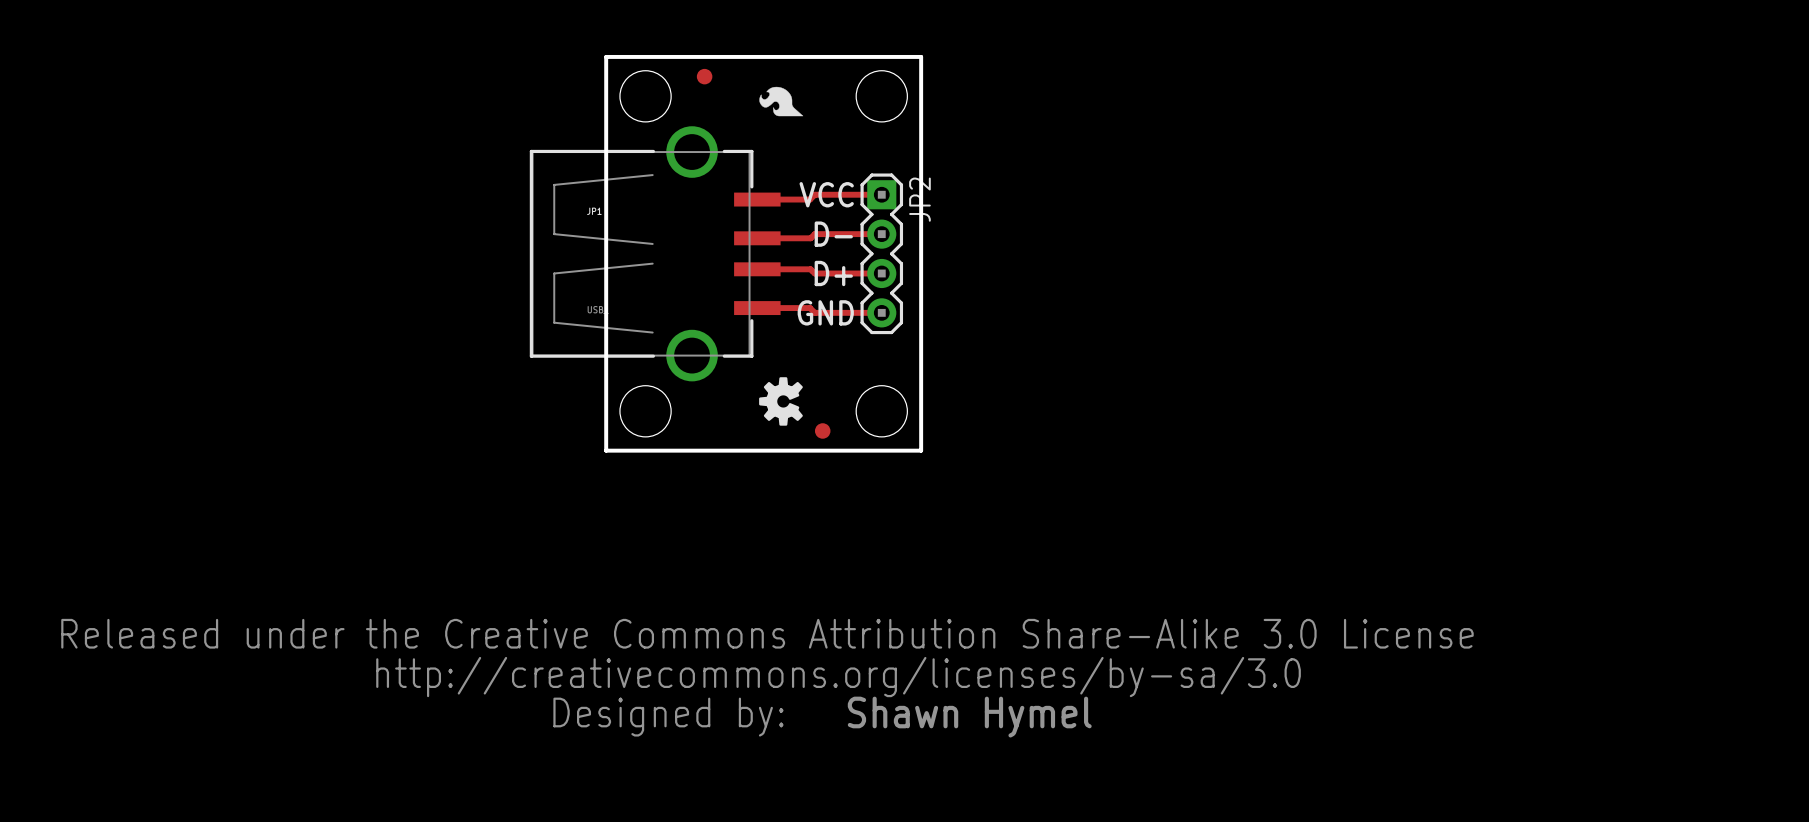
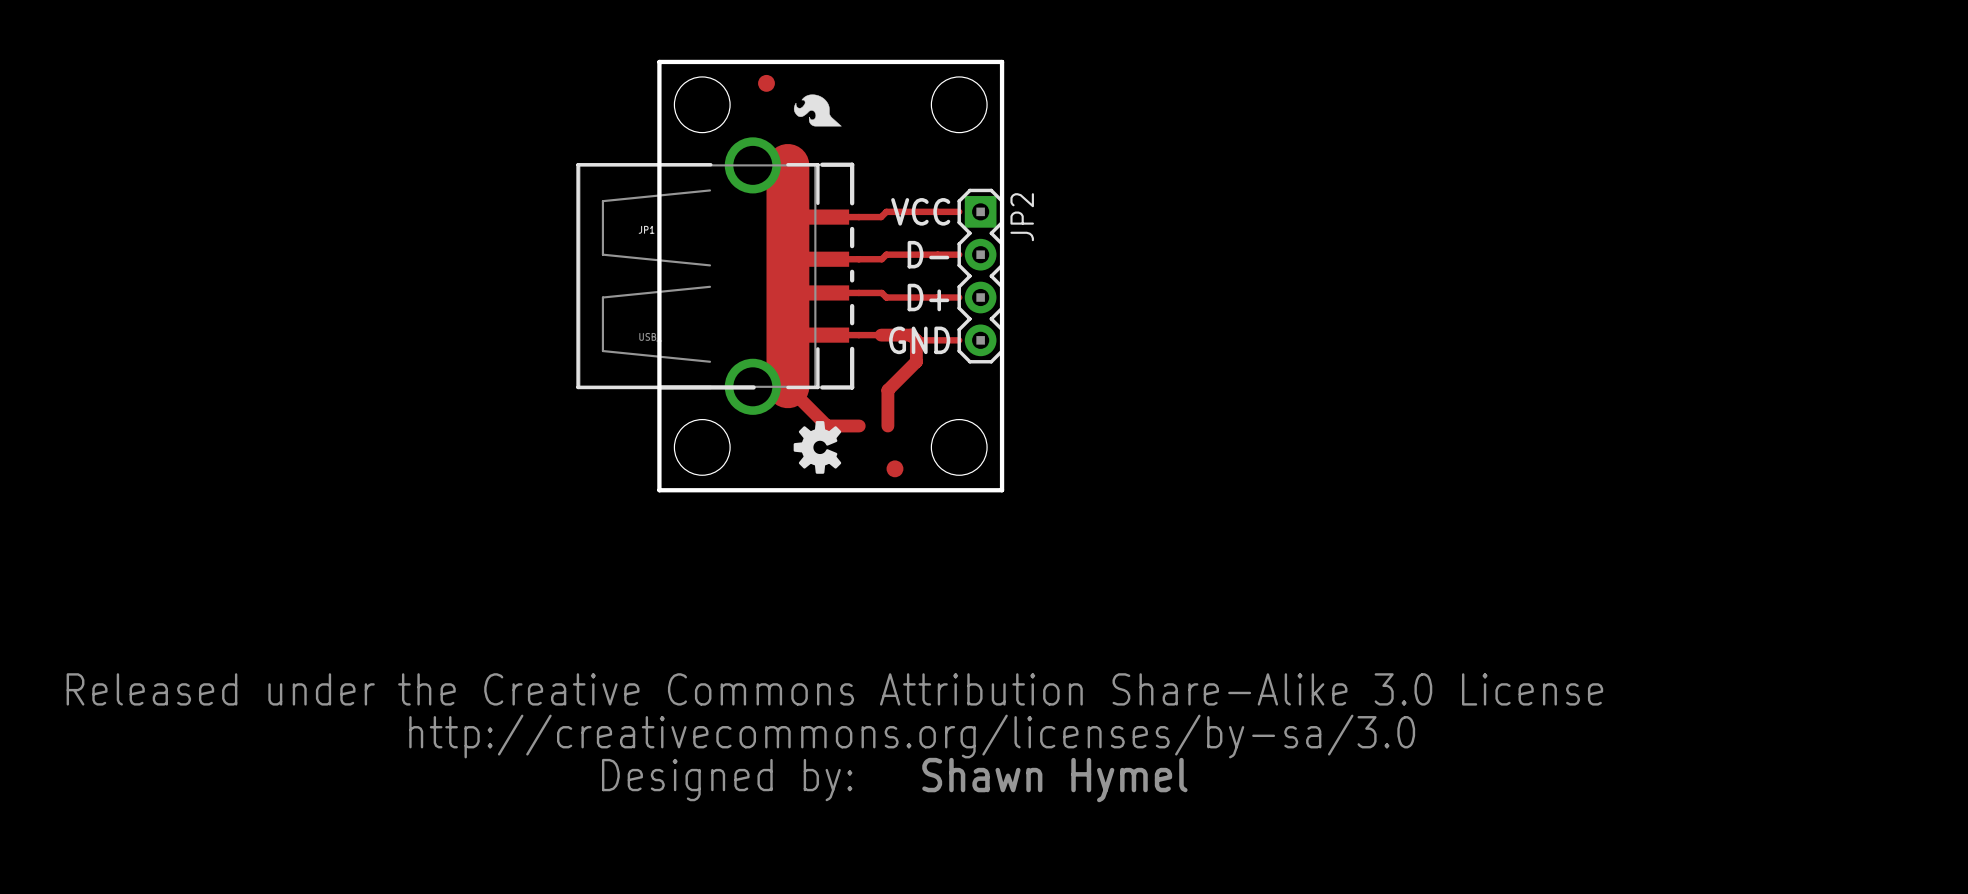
drawing position: (781, 101) -> (817, 110)
line: none -> (822, 164) (852, 164) (852, 203)
track: none -> (787, 165) (787, 386) (827, 426) (859, 426)
text position: VCC (826, 194) -> VCC (920, 211)
line: none -> (852, 228) (852, 246)
text position: D- (833, 234) -> D- (928, 254)
line: none -> (852, 271) (852, 280)
JP2 position: (881, 253) -> (980, 276)
text position: D+ (833, 273) -> D+ (928, 297)
line: none -> (852, 306) (852, 323)
track: (810, 308) (814, 312) (842, 312) -> (881, 335) (911, 335) (916, 340) (916, 361) (887, 390) (887, 426)
text position: GND (825, 312) -> GND (919, 340)
line: none -> (852, 348) (852, 387) (822, 387)
line: none -> (659, 387) (753, 387)
drawing position: (780, 401) -> (817, 447)

